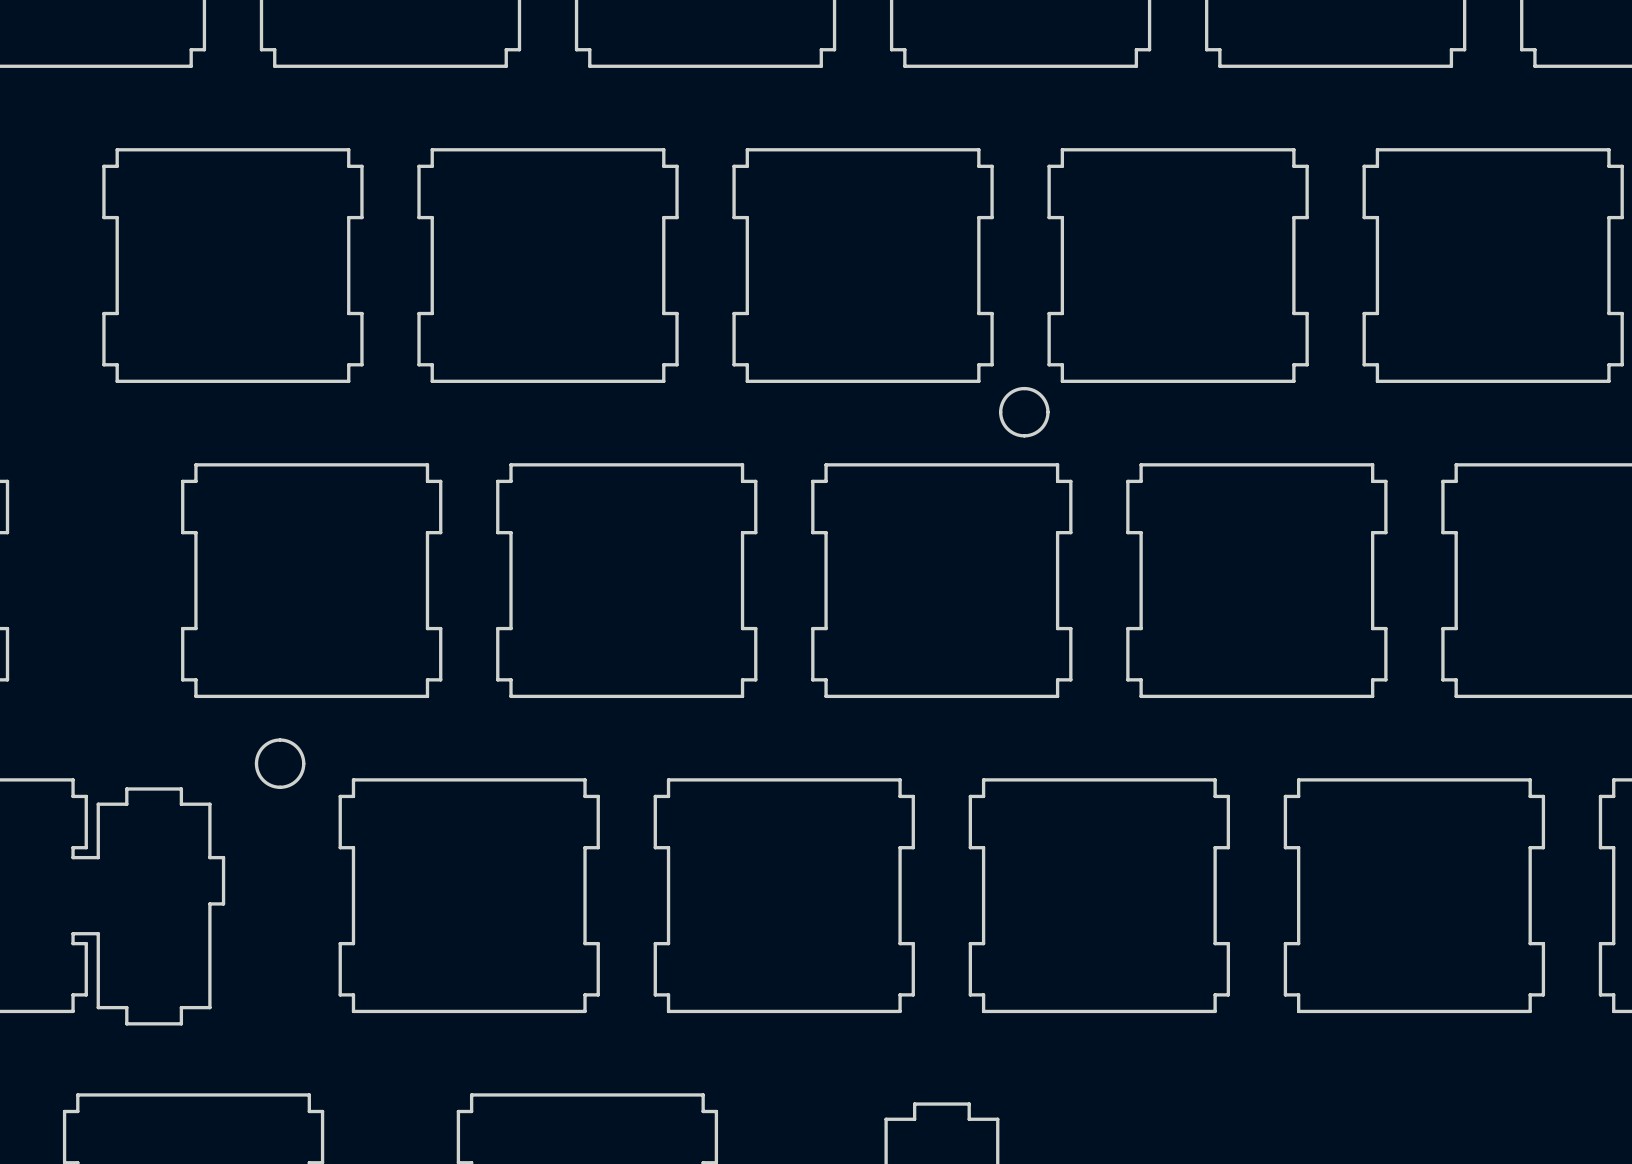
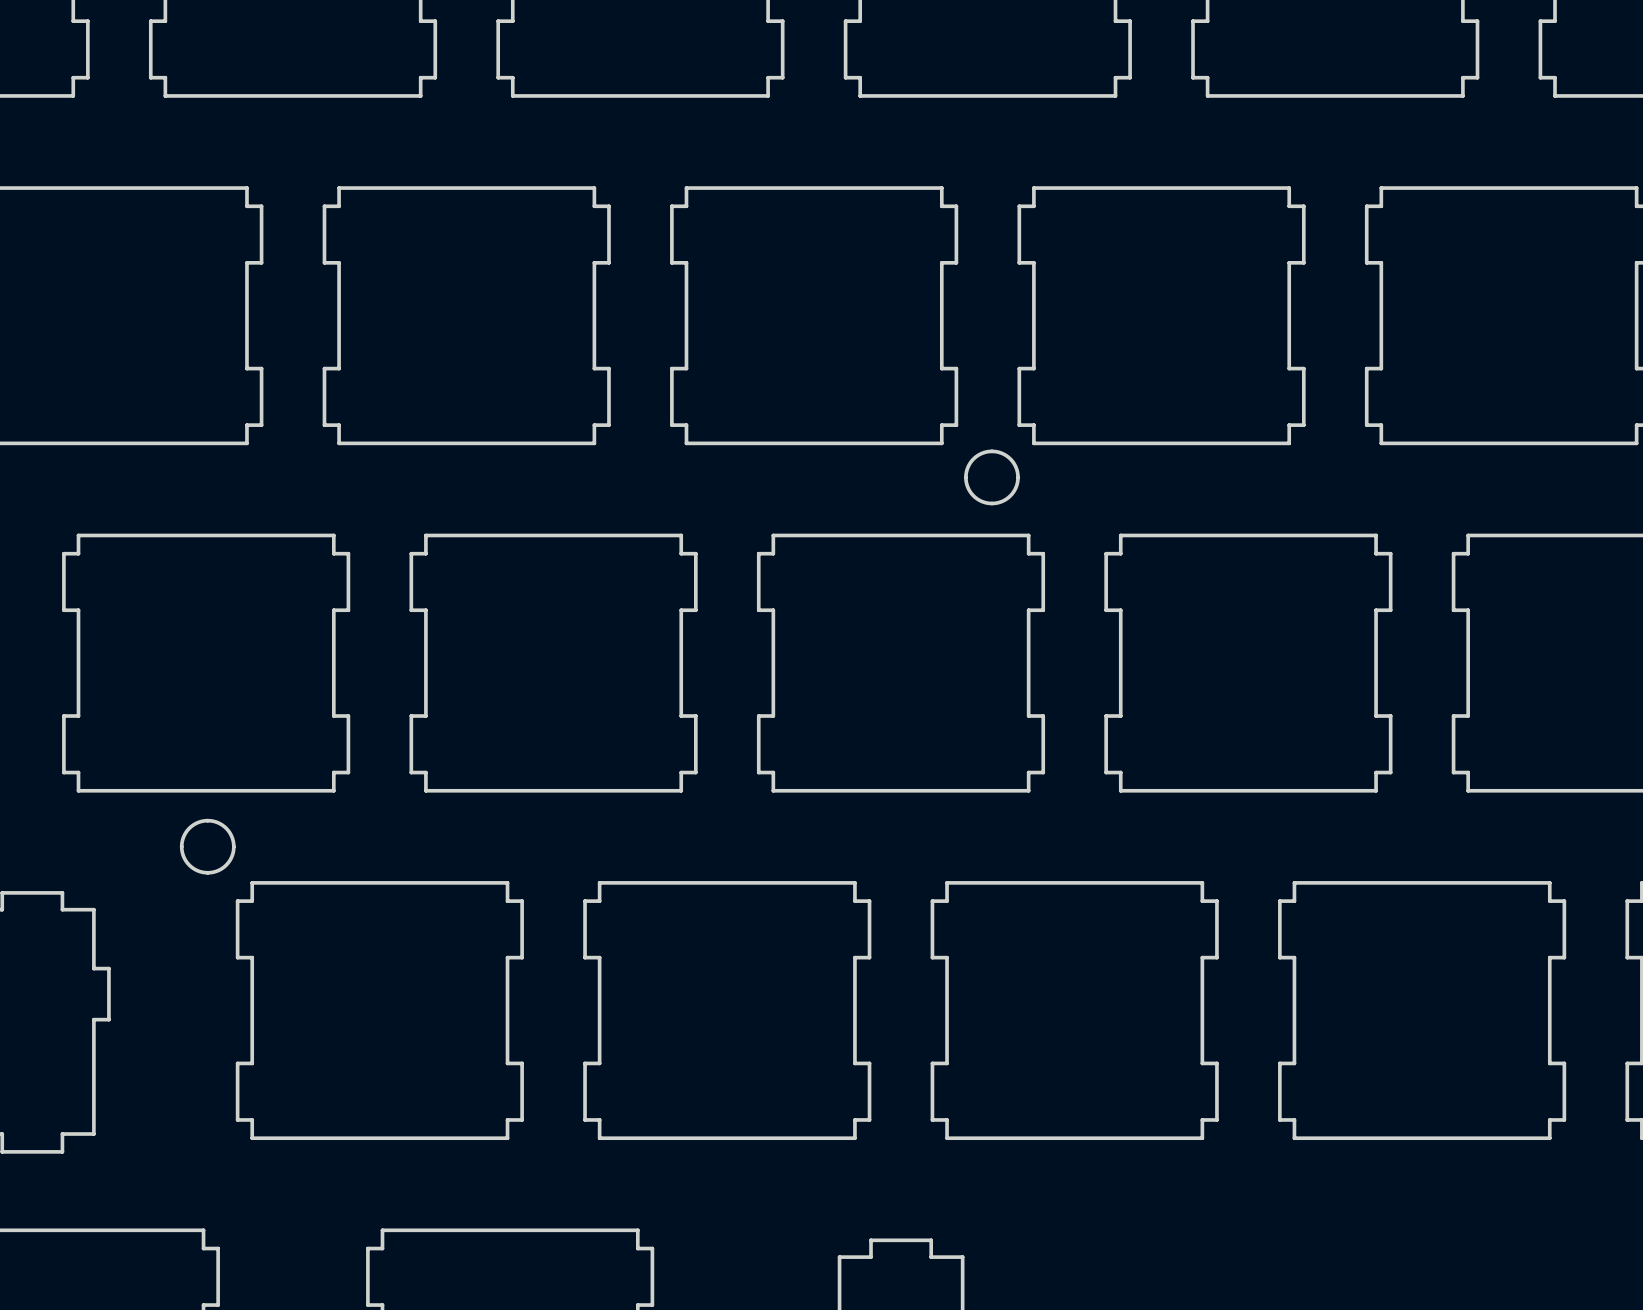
board edge: (280, 740) (270, 741) (263, 746) (258, 754) (256, 763) (258, 772) (263, 780) (270, 785) (280, 787) (289, 785) (296, 780) (301, 772) (303, 763) (301, 754) (296, 746) (289, 741) (280, 740) -> (207, 820) (197, 822) (189, 828) (183, 836) (181, 846) (183, 856) (189, 865) (197, 870) (207, 872) (217, 870) (226, 865) (231, 856) (233, 846) (231, 836) (226, 828) (217, 822) (207, 820)

